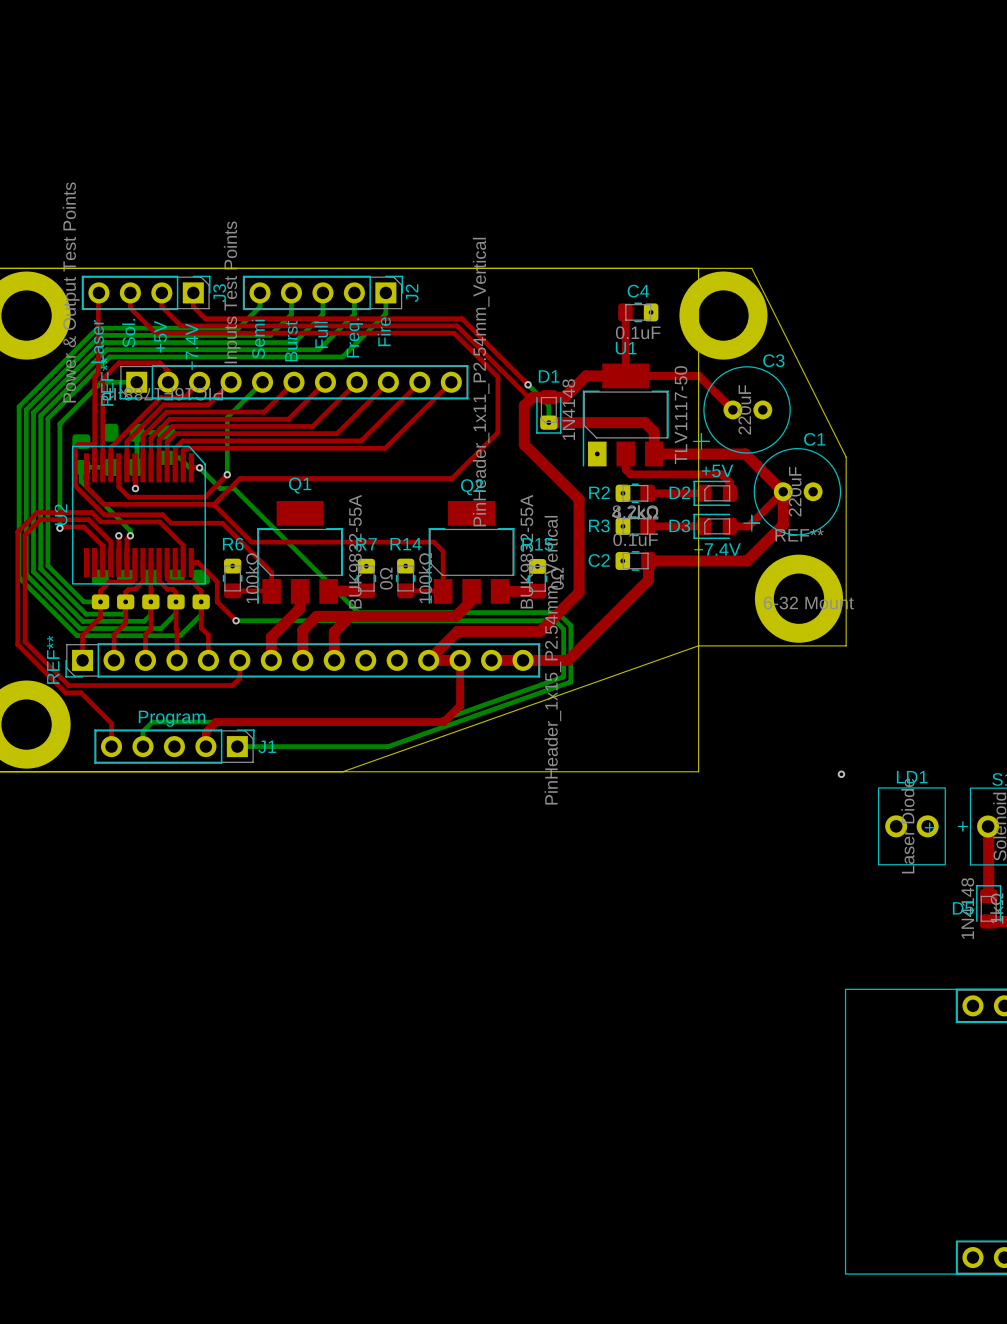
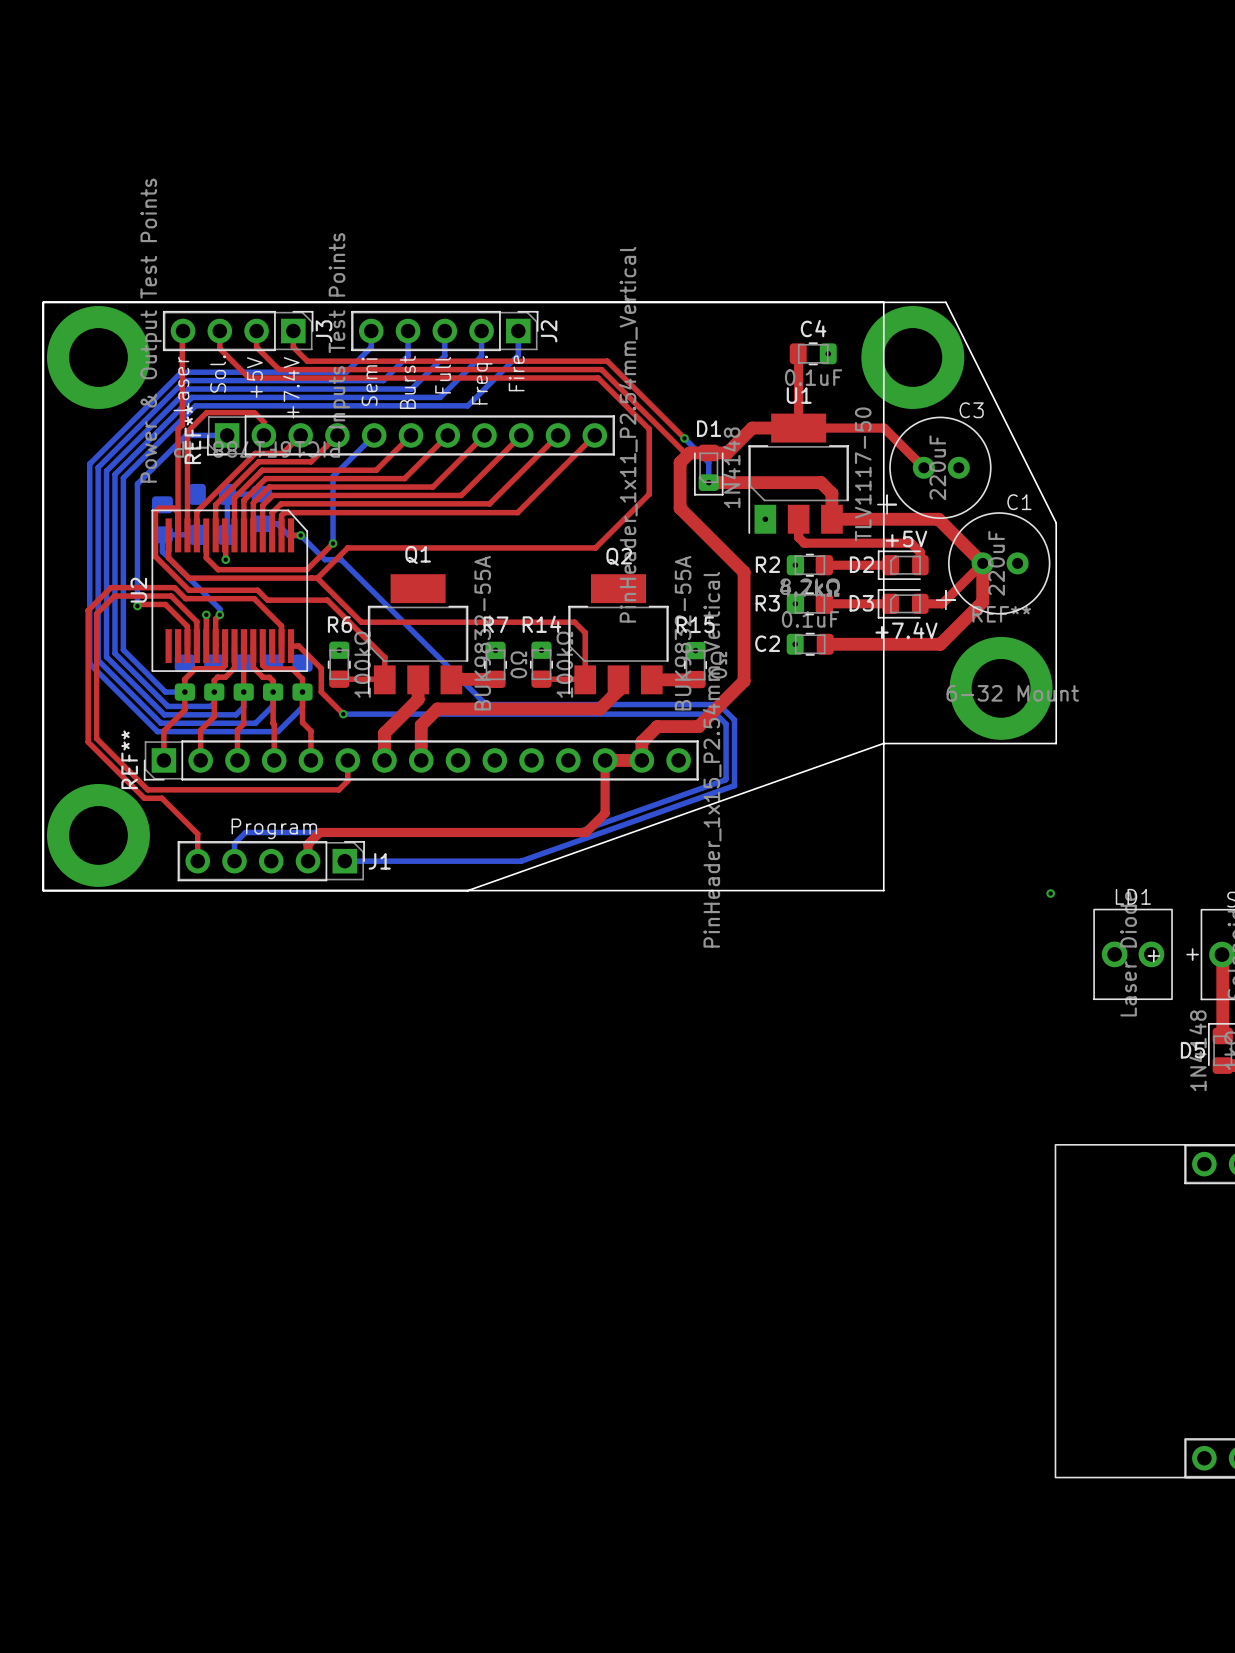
top track: (648, 560) (648, 580) (568, 660) (491, 660) -> none
top track: (350, 616) (334, 632) (334, 660) -> none
top track: (504, 631) (457, 631) (428, 660) (460, 660) -> (657, 726) (641, 742) (641, 760) (605, 760)

